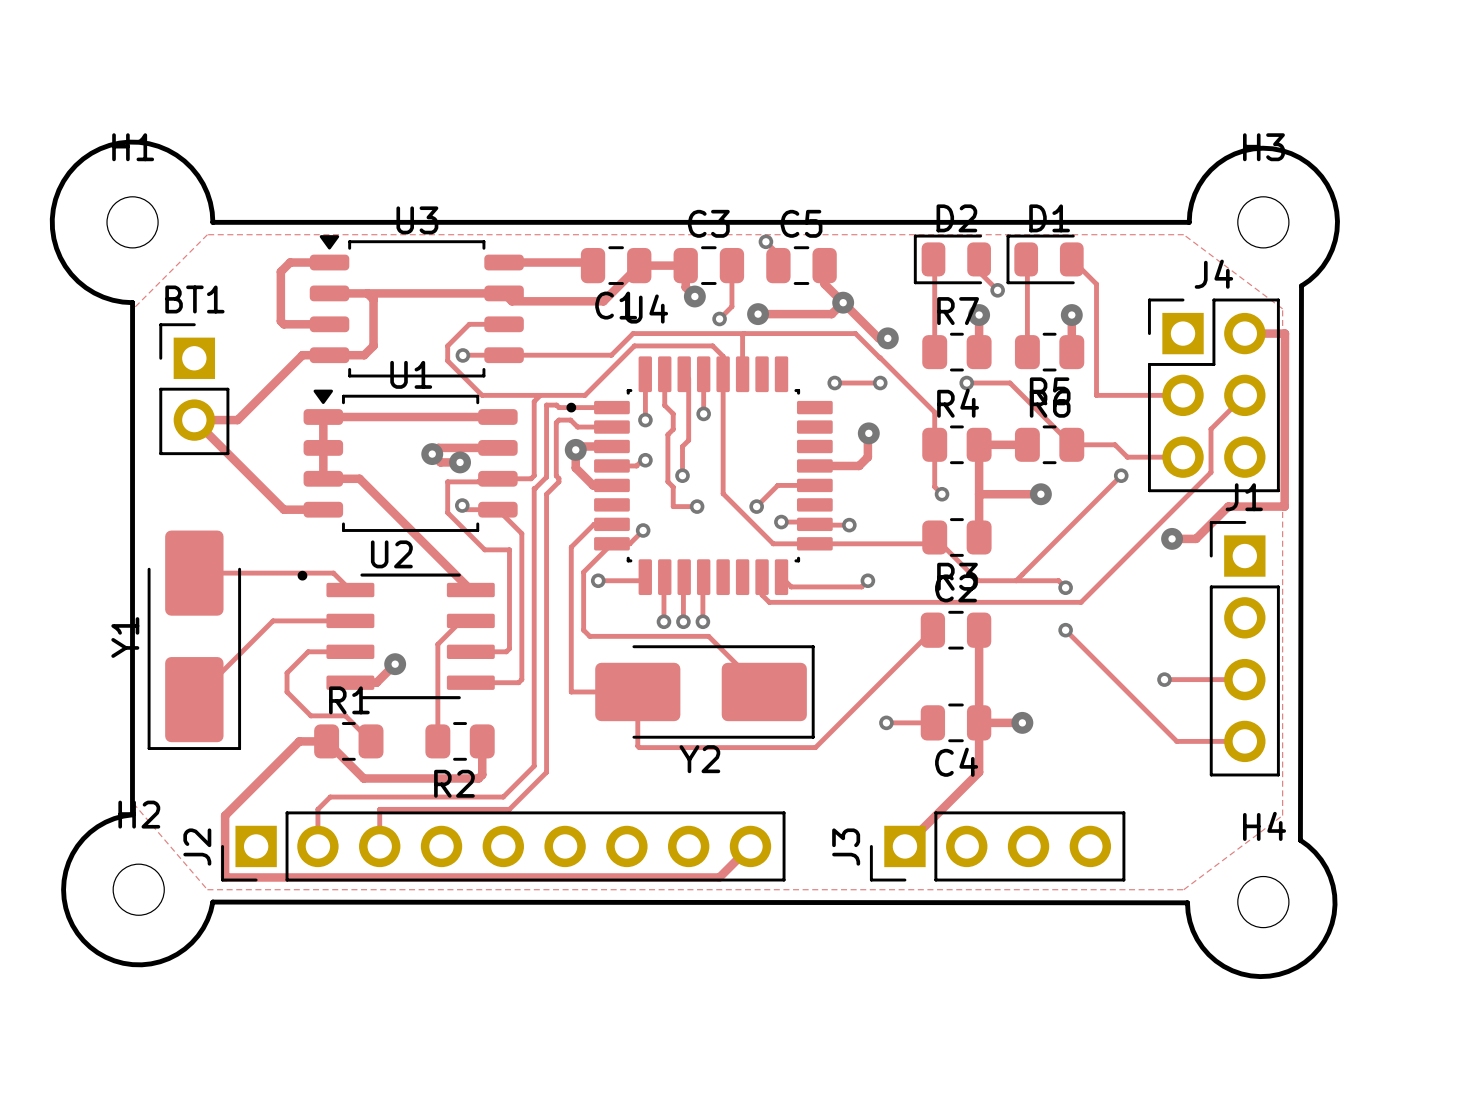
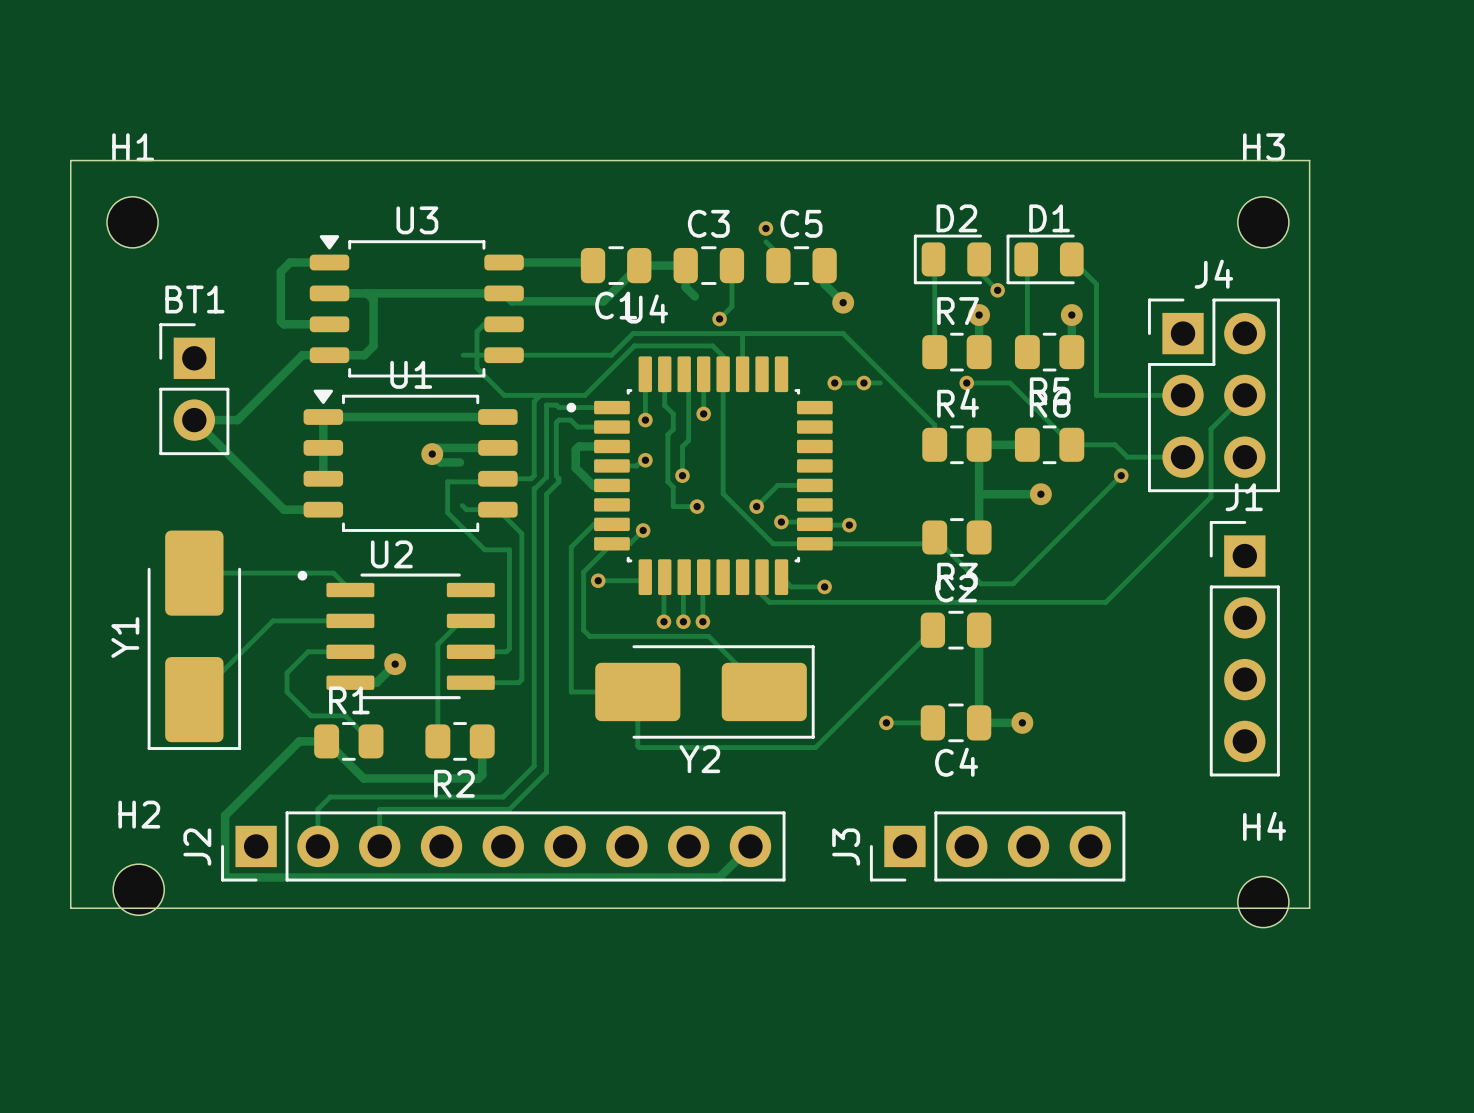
board edge: (212, 222) (1189, 222) (1191, 203) (1199, 185) (1210, 170) (1226, 158) (1243, 150) (1262, 148) (1282, 150) (1299, 157) (1315, 169) (1327, 184) (1334, 202) (1337, 221) (1335, 240) (1328, 258) (1316, 273) (1301, 285) (1300, 840) (1321, 859) (1333, 885) (1334, 914) (1324, 941) (1312, 956) (1297, 967) (1279, 974) (1260, 976) (1232, 970) (1208, 954) (1193, 930) (1187, 902) (212, 902) (207, 919) (198, 935) (184, 949) (168, 958) (151, 963) (132, 964) (114, 960) (97, 952) (83, 940) (72, 925) (65, 908) (63, 889) (68, 862) (83, 838) (105, 822) (132, 814) (132, 302) (103, 297) (85, 287) (71, 274) (60, 257) (53, 238) (53, 209) (63, 181) (83, 158) (109, 145) (139, 142) (167, 150) (191, 167) (207, 193) (212, 222) -> (70, 160) (70, 908) (1309, 908) (1309, 160) (70, 160)
zone outline: (207, 234) (1183, 234) (1282, 308) (1282, 815) (1183, 889) (207, 889) (133, 803) (133, 308) (207, 234) -> none
via position: (765, 241) -> (765, 228)
via: (694, 296) -> none
track: (758, 314) (831, 314) (843, 302) (878, 338) (887, 338) -> none
via: (758, 314) -> none
track: (484, 324) (469, 324) (447, 345) (447, 360) (482, 395) (504, 395) -> (484, 324) (477, 331) (477, 368) (504, 395)
track: (843, 333) (855, 333) (879, 357) -> none
track: (1244, 333) (1284, 333) (1284, 506) (1228, 506) (1196, 538) (1172, 538) -> none
via: (887, 338) -> none
via: (462, 355) -> none
track: (880, 357) (934, 412) (934, 425) -> (843, 333) (934, 425)
via position: (880, 383) -> (863, 383)
track: (868, 433) (867, 457) (859, 465) (814, 465) -> none
via: (868, 433) -> none
track: (934, 444) (934, 486) (942, 494) -> none
via: (575, 449) -> none
via: (460, 462) -> none
track: (1211, 472) (1081, 602) -> (1211, 472) (1211, 497) (1105, 602) (1081, 602)
track: (323, 478) (359, 478) (470, 590) -> none
via: (942, 494) -> none
via: (462, 505) -> none
via: (1172, 538) -> none
track: (867, 580) (861, 586) (824, 586) -> none
via position: (867, 580) -> (824, 586)
track: (977, 580) (1058, 580) (1065, 587) -> (977, 580) (981, 583) (1013, 583) (1016, 580)
via: (1065, 587) -> none
track: (1065, 630) (1176, 741) (1244, 741) -> none
via: (1065, 630) -> none
track: (1164, 679) (1244, 679) -> none
via: (1164, 679) -> none
track: (979, 722) (979, 772) (904, 846) -> none

